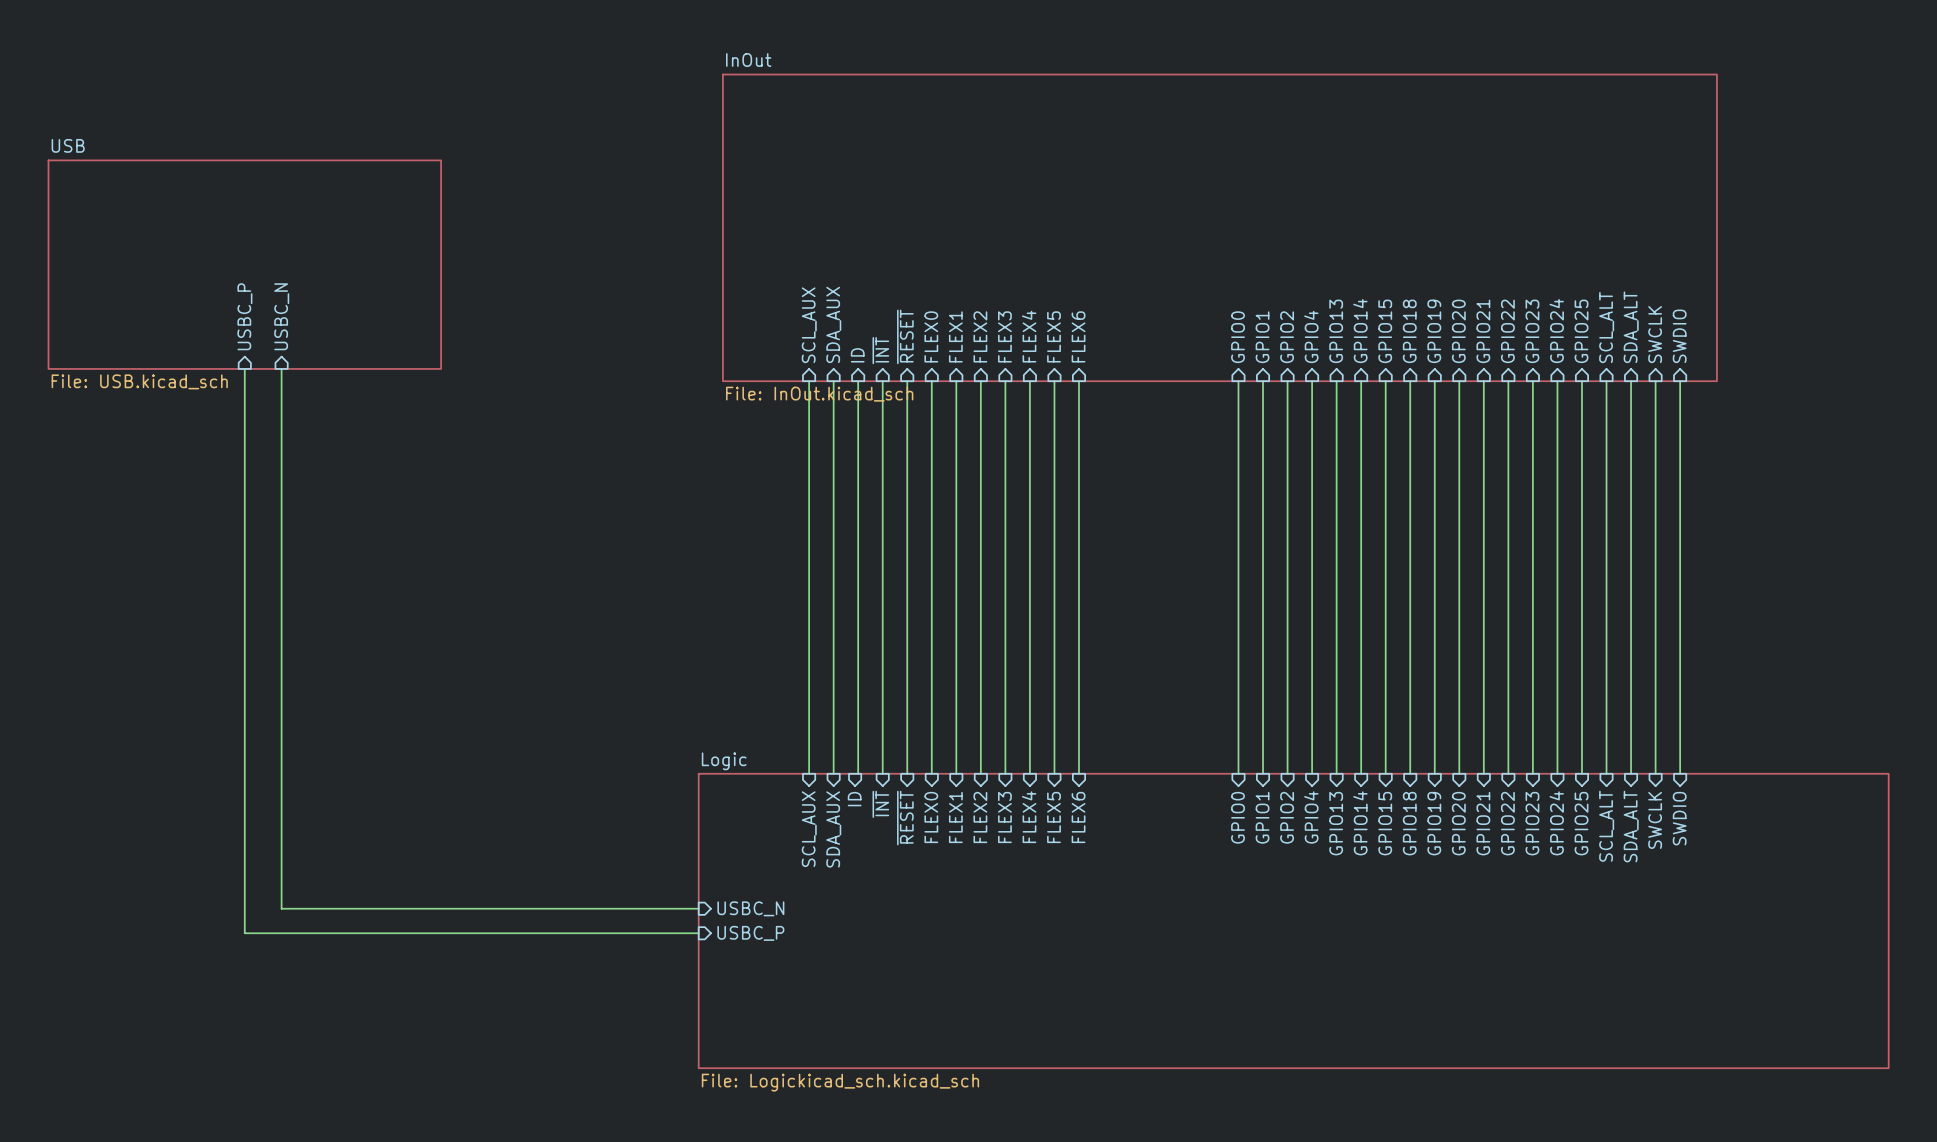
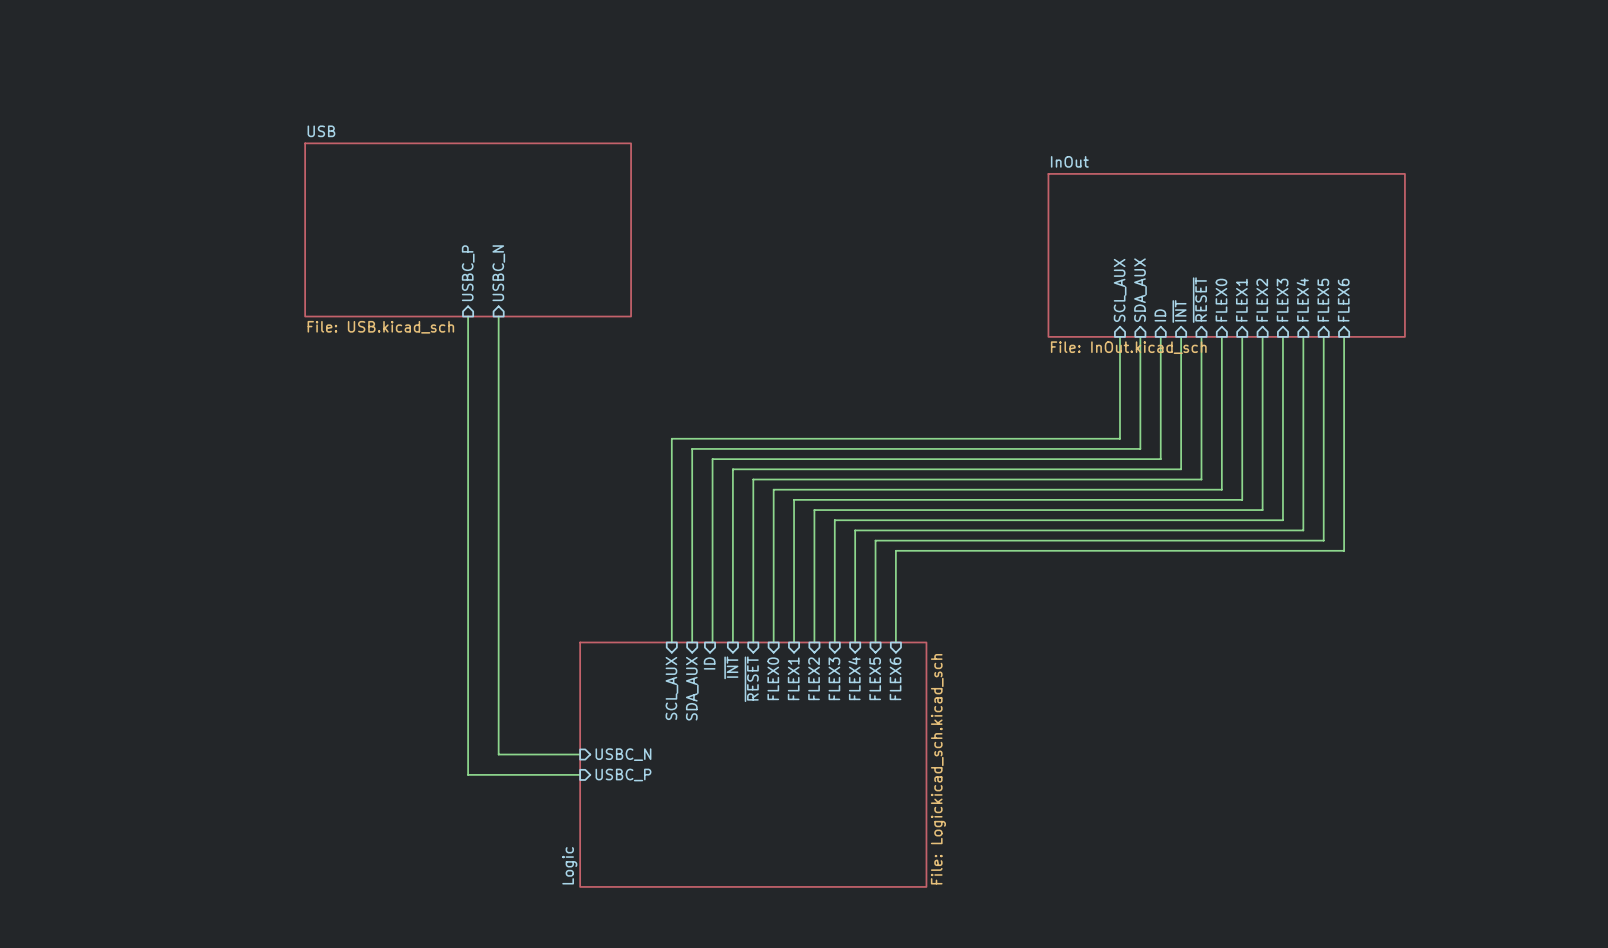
sheet InOut: File: InOut.kicad_sch (1219, 227) -> none
sheet USB: File: USB.kicad_sch (244, 264) -> none
sheet USB: none -> File: USB.kicad_sch (468, 229)
sheet InOut: none -> File: InOut.kicad_sch (1226, 255)
sheet pin: USBC_P (244, 316) -> none
sheet pin: USBC_N (281, 316) -> none
sheet pin: SDA_AUX (833, 324) -> none
sheet pin: SCL_AUX (809, 325) -> none
sheet pin: SCL_ALT (1606, 327) -> none
sheet pin: SDA_ALT (1631, 327) -> none
sheet pin: none -> USBC_P (468, 273)
sheet pin: none -> USBC_N (498, 273)
sheet pin: GPIO13 (1336, 331) -> none
sheet pin: GPIO14 (1360, 331) -> none
sheet pin: GPIO15 (1385, 331) -> none
sheet pin: GPIO18 (1409, 331) -> none
sheet pin: GPIO19 (1434, 331) -> none
sheet pin: GPIO20 (1458, 331) -> none
sheet pin: GPIO21 (1483, 331) -> none
sheet pin: GPIO22 (1507, 331) -> none
sheet pin: GPIO23 (1532, 331) -> none
sheet pin: GPIO24 (1556, 331) -> none
sheet pin: GPIO25 (1581, 331) -> none
sheet pin: SWCLK (1655, 334) -> none
sheet pin: ~{RESET} (905, 336) -> none
sheet pin: FLEX0 (931, 336) -> none
sheet pin: FLEX1 (955, 336) -> none
sheet pin: FLEX2 (980, 336) -> none
sheet pin: FLEX3 (1004, 336) -> none
sheet pin: FLEX4 (1029, 336) -> none
sheet pin: FLEX5 (1054, 336) -> none
sheet pin: FLEX6 (1078, 336) -> none
sheet pin: GPIO4 (1311, 336) -> none
sheet pin: SWDIO (1679, 336) -> none
sheet pin: GPIO0 (1238, 337) -> none
sheet pin: GPIO1 (1262, 337) -> none
sheet pin: GPIO2 (1287, 337) -> none
sheet pin: none -> SCL_AUX (1120, 290)
sheet pin: none -> SDA_AUX (1140, 290)
sheet pin: ~{INT} (880, 350) -> none
sheet pin: ID (857, 355) -> none
sheet pin: none -> ~{RESET} (1199, 300)
sheet pin: none -> FLEX0 (1221, 300)
sheet pin: none -> FLEX1 (1241, 300)
sheet pin: none -> FLEX2 (1262, 300)
sheet pin: none -> FLEX3 (1282, 300)
sheet pin: none -> FLEX4 (1302, 299)
sheet pin: none -> FLEX5 (1323, 300)
sheet pin: none -> FLEX6 (1343, 300)
wire: (244, 368) (244, 933) (563, 933) -> (468, 316) (468, 774)
wire: (281, 368) (281, 908) (600, 908) -> (498, 316) (498, 754)
sheet pin: none -> ~{INT} (1179, 311)
sheet pin: none -> ID (1160, 315)
wire: (809, 381) (809, 528) -> (1120, 336) (1120, 438) (671, 438)
wire: (833, 381) (833, 540) -> (1140, 336) (1140, 448) (692, 448)
wire: (858, 381) (858, 552) -> (1160, 336) (1160, 459) (712, 459)
wire: (882, 381) (882, 565) -> (1181, 336) (1181, 469) (732, 469)
wire: (907, 381) (907, 577) -> (1201, 336) (1201, 479) (753, 479)
wire: (931, 381) (931, 589) -> (1221, 336) (1221, 489) (773, 489)
wire: (956, 381) (956, 602) -> (1242, 336) (1242, 499) (794, 499)
wire: (980, 381) (980, 614) -> (1262, 336) (1262, 510) (814, 510)
wire: (1005, 381) (1005, 626) -> (1282, 336) (1282, 520) (834, 520)
wire: (1029, 381) (1029, 638) -> (1303, 336) (1303, 530) (855, 530)
wire: (1054, 381) (1054, 651) -> (1323, 336) (1323, 540) (875, 540)
wire: (1079, 381) (1079, 663) -> (1344, 336) (1344, 550) (895, 550)
wire: (1238, 381) (1238, 773) -> none
wire: (1263, 381) (1263, 773) -> none
wire: (1287, 381) (1287, 773) -> none
wire: (1312, 381) (1312, 773) -> none
wire: (1336, 381) (1336, 773) -> none
wire: (1361, 381) (1361, 773) -> none
wire: (1385, 381) (1385, 773) -> none
wire: (1410, 381) (1410, 773) -> none
wire: (1434, 381) (1434, 773) -> none
wire: (1459, 381) (1459, 773) -> none
wire: (1483, 381) (1483, 773) -> none
wire: (1508, 381) (1508, 773) -> none
wire: (1532, 381) (1532, 773) -> none
wire: (1557, 381) (1557, 773) -> none
wire: (1581, 381) (1581, 773) -> none
wire: (1606, 381) (1606, 773) -> none
wire: (1631, 381) (1631, 773) -> none
wire: (1655, 381) (1655, 773) -> none
wire: (1680, 381) (1680, 773) -> none
sheet pin: GPIO0 (1238, 817) -> none
sheet pin: GPIO1 (1262, 817) -> none
sheet pin: GPIO2 (1287, 817) -> none
sheet pin: GPIO4 (1311, 817) -> none
sheet pin: SWDIO (1679, 818) -> none
sheet pin: SWCLK (1655, 820) -> none
sheet pin: GPIO13 (1336, 823) -> none
sheet pin: GPIO14 (1360, 823) -> none
sheet pin: GPIO15 (1385, 823) -> none
sheet pin: GPIO18 (1409, 823) -> none
sheet pin: GPIO19 (1434, 823) -> none
sheet pin: GPIO20 (1458, 823) -> none
sheet pin: GPIO21 (1483, 823) -> none
sheet pin: GPIO22 (1507, 823) -> none
sheet pin: GPIO23 (1532, 823) -> none
sheet pin: GPIO24 (1556, 823) -> none
sheet pin: GPIO25 (1581, 823) -> none
sheet pin: SCL_ALT (1606, 826) -> none
sheet pin: SDA_ALT (1631, 826) -> none
sheet Logic: none -> File: Logickicad_sch.kicad_sch (753, 764)
sheet Logic: File: Logickicad_sch.kicad_sch (1293, 920) -> none

